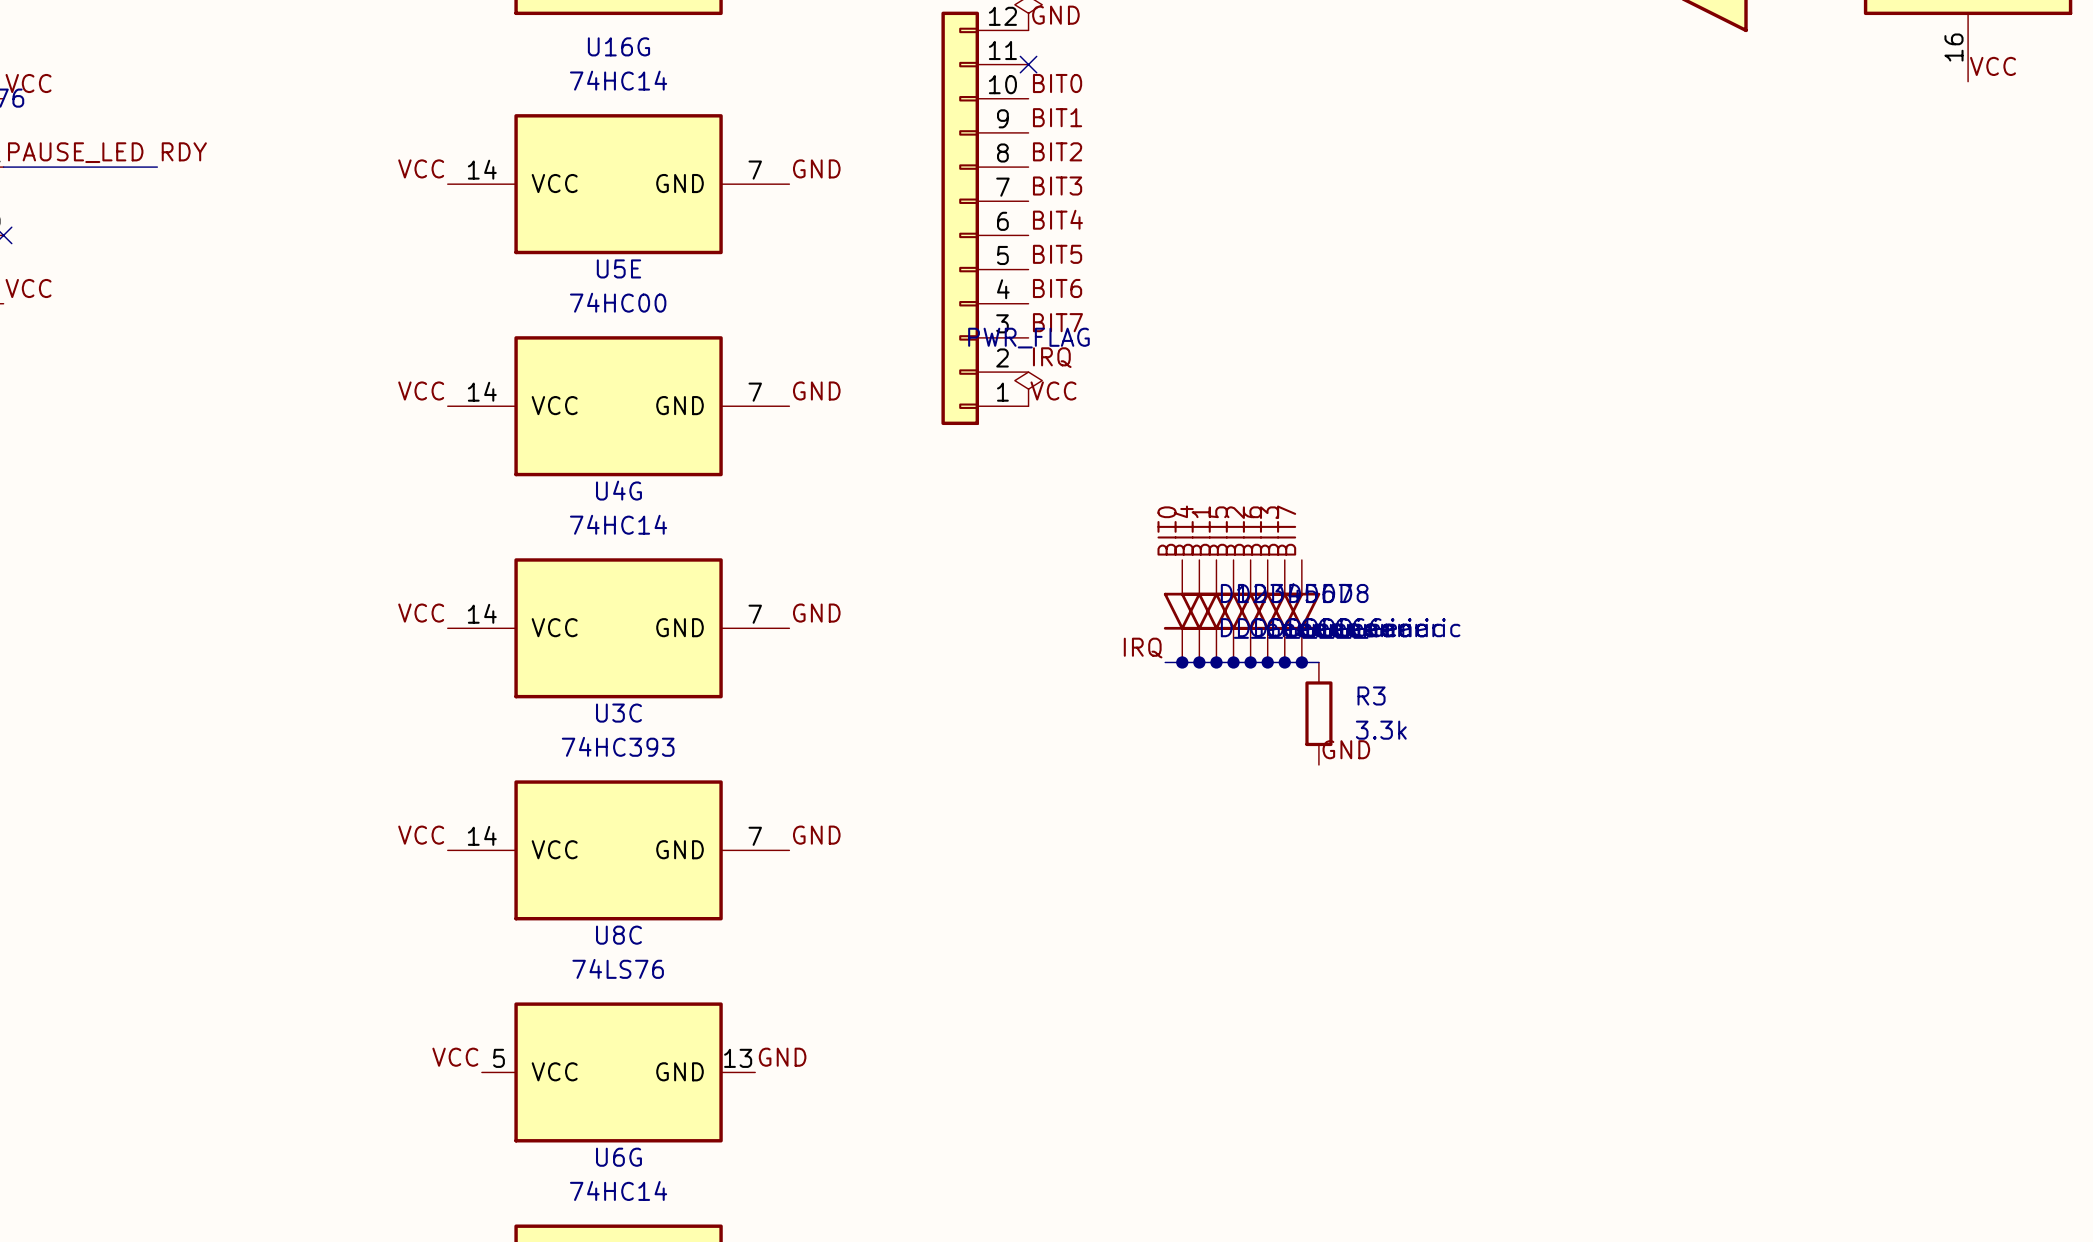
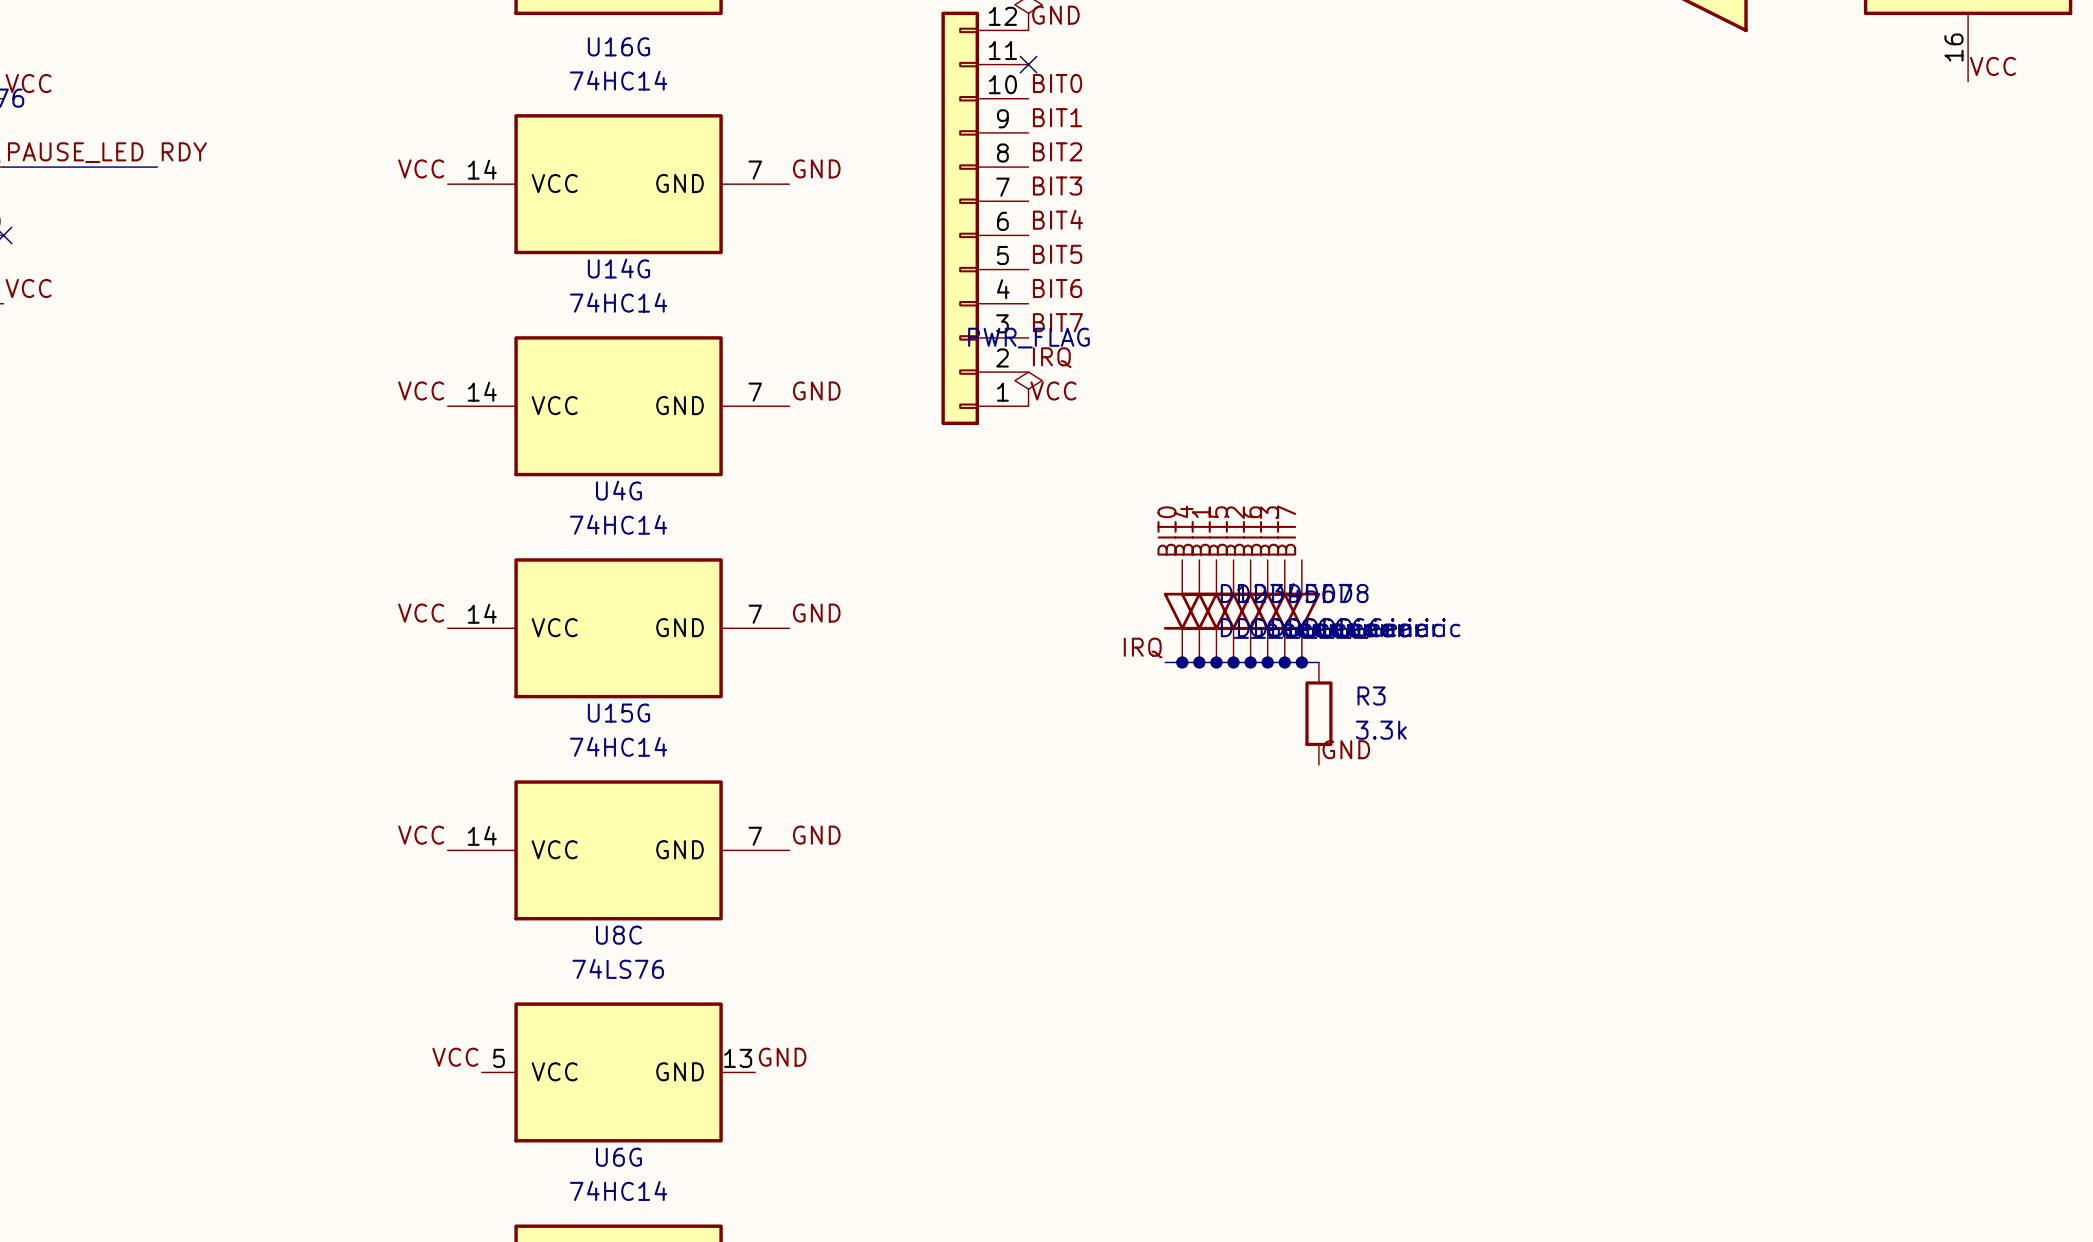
U5E name: U5E (618, 268) -> U14G (618, 268)
U5E value: 74HC00 (618, 302) -> 74HC14 (618, 302)
U3C name: U3C (618, 713) -> U15G (618, 713)
U3C value: 74HC393 (618, 746) -> 74HC14 (618, 746)

